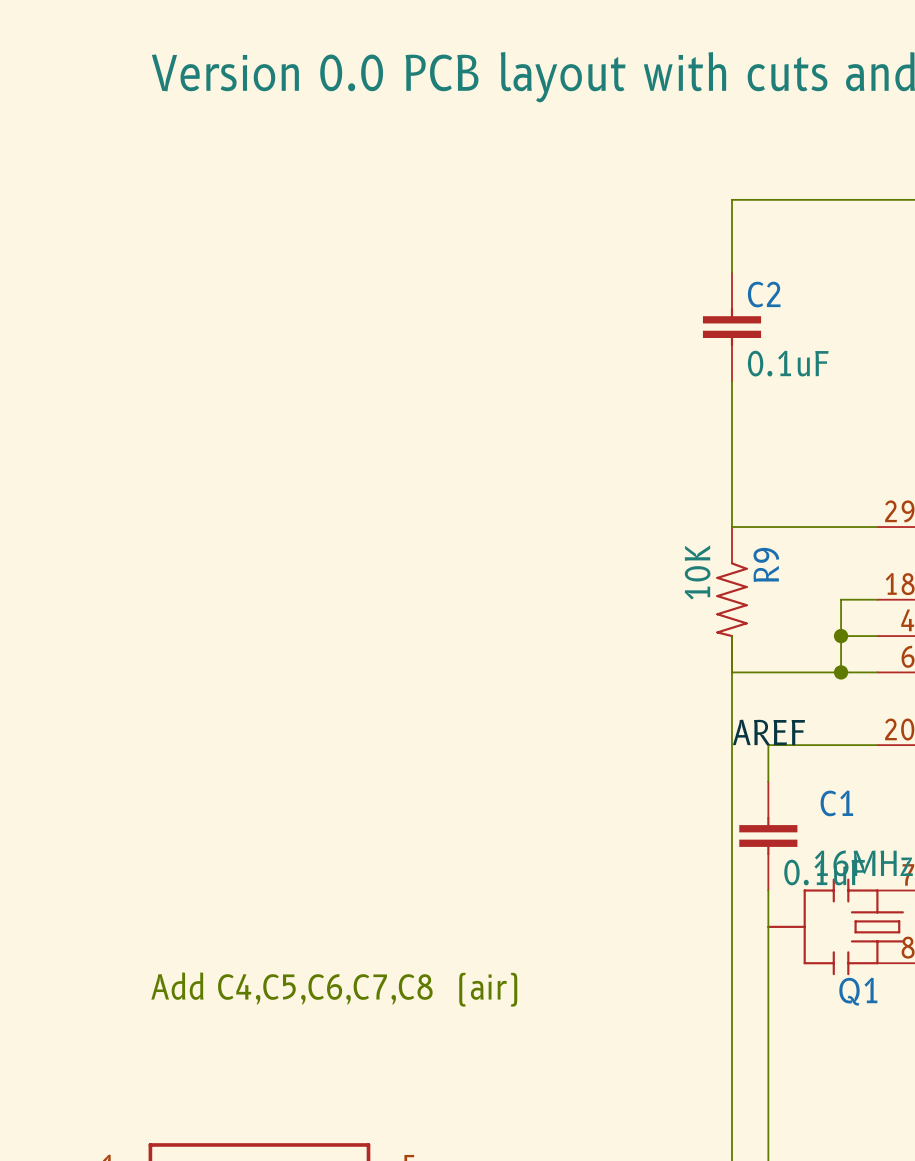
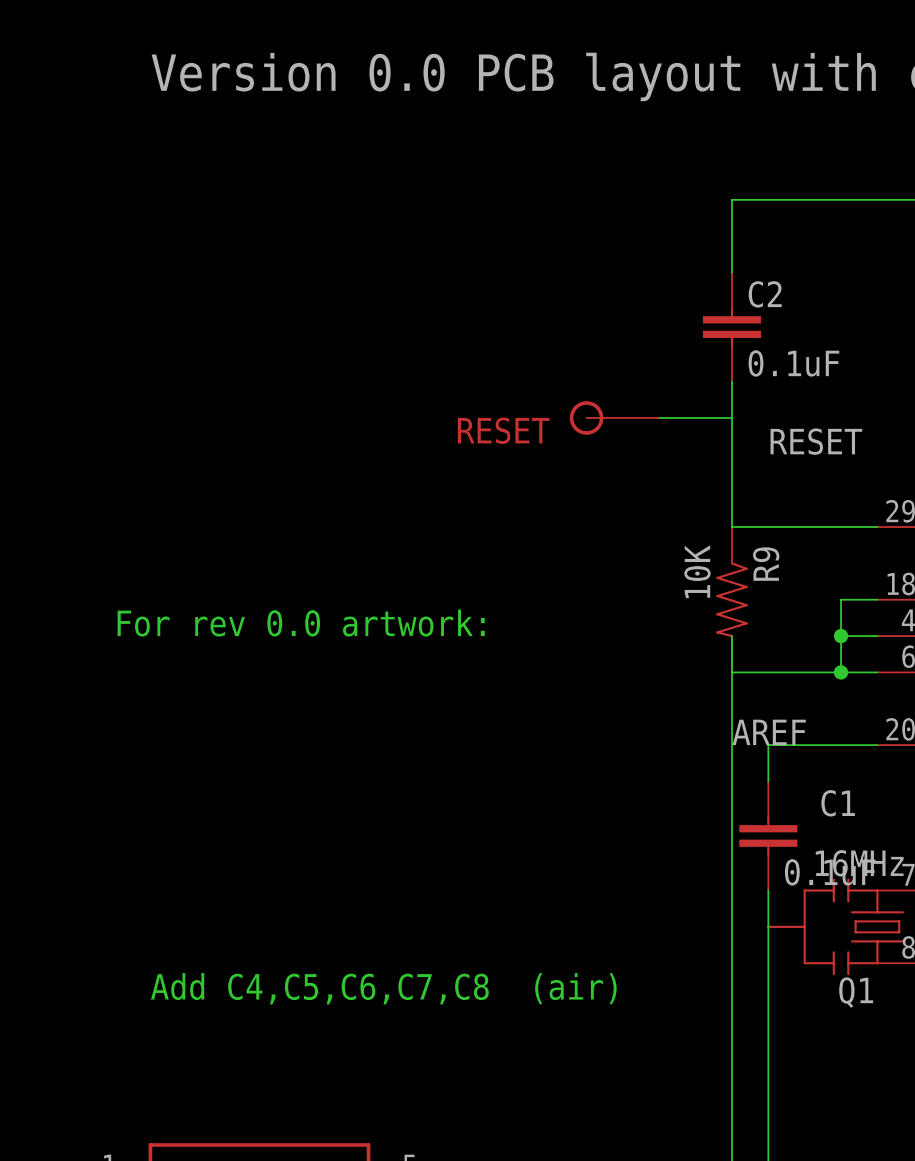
RESET: none -> (614, 417)
wire: none -> (659, 417) (732, 417)
label: none -> RESET (816, 441)
text: none -> For rev 0.0 artwork: (301, 623)

